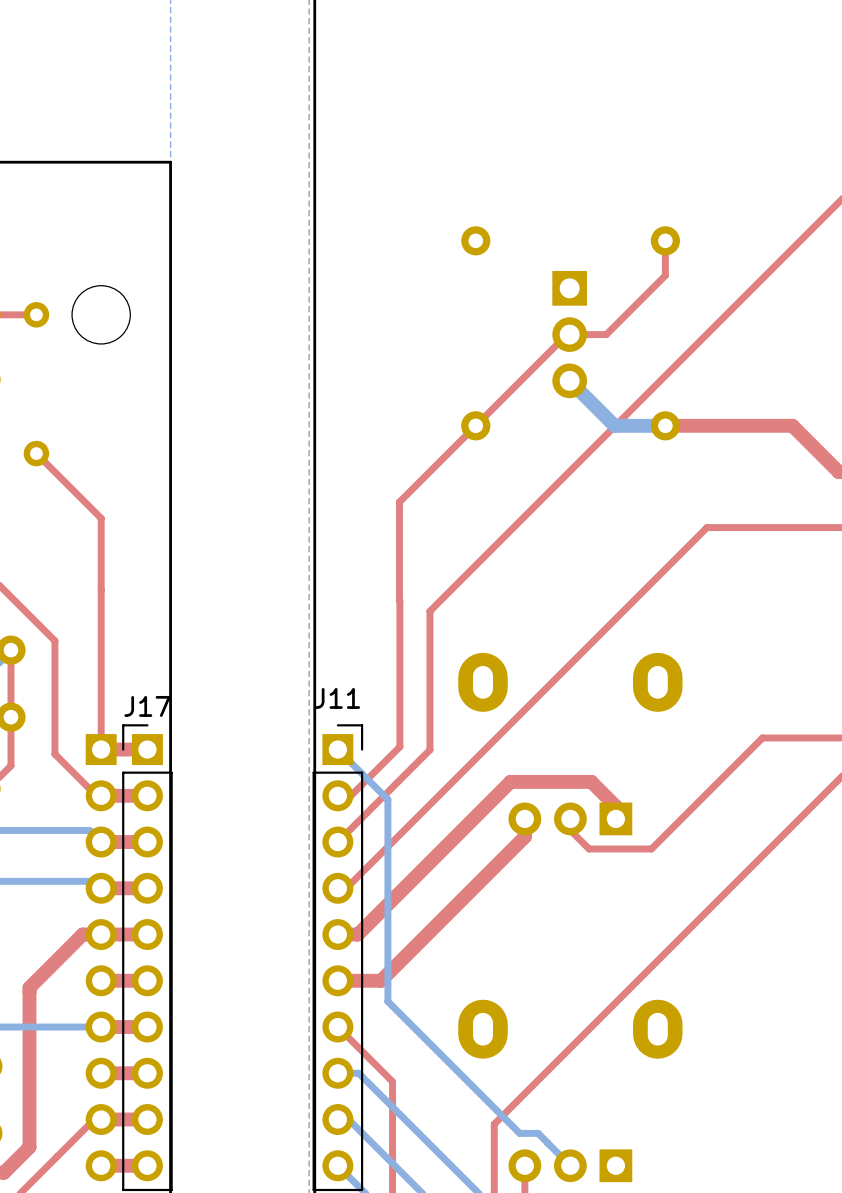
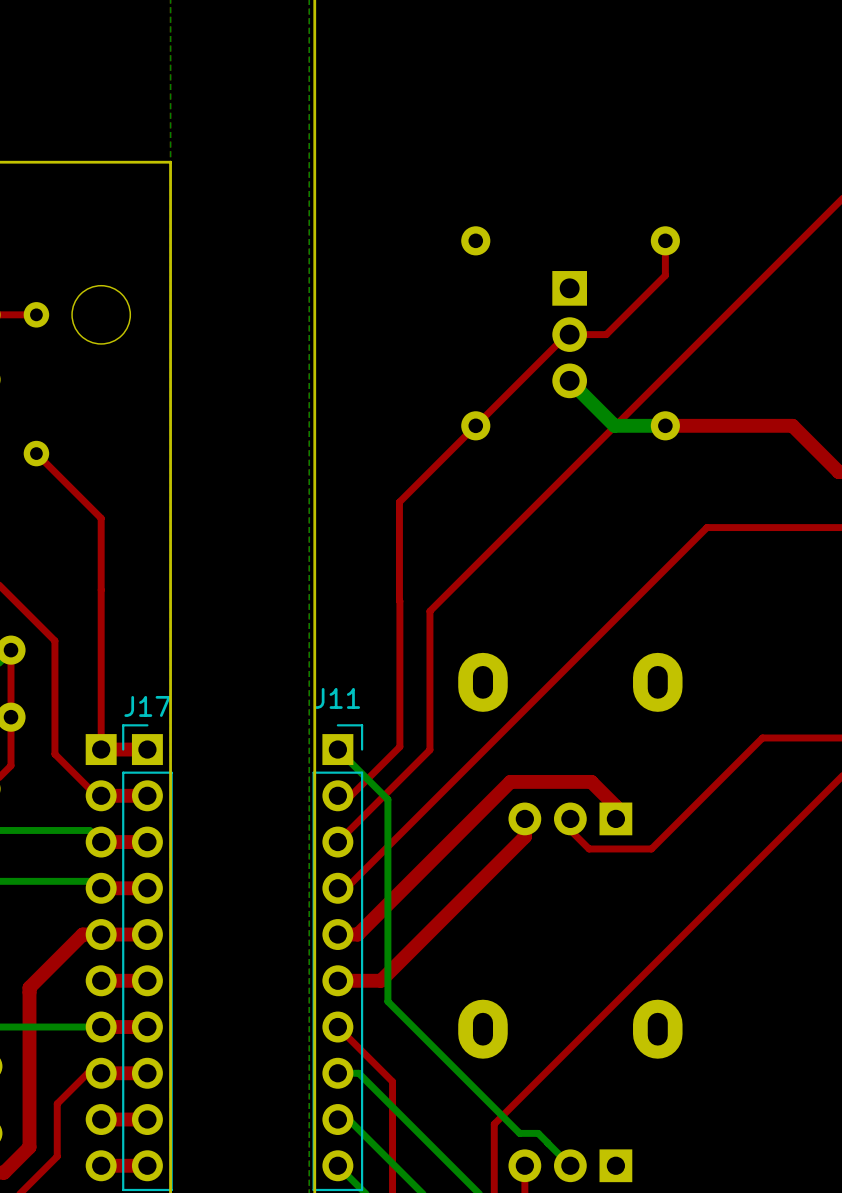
top track: (101, 1119) (94, 1119) (57, 1156) -> (101, 1073) (87, 1073) (57, 1103) (57, 1156)

